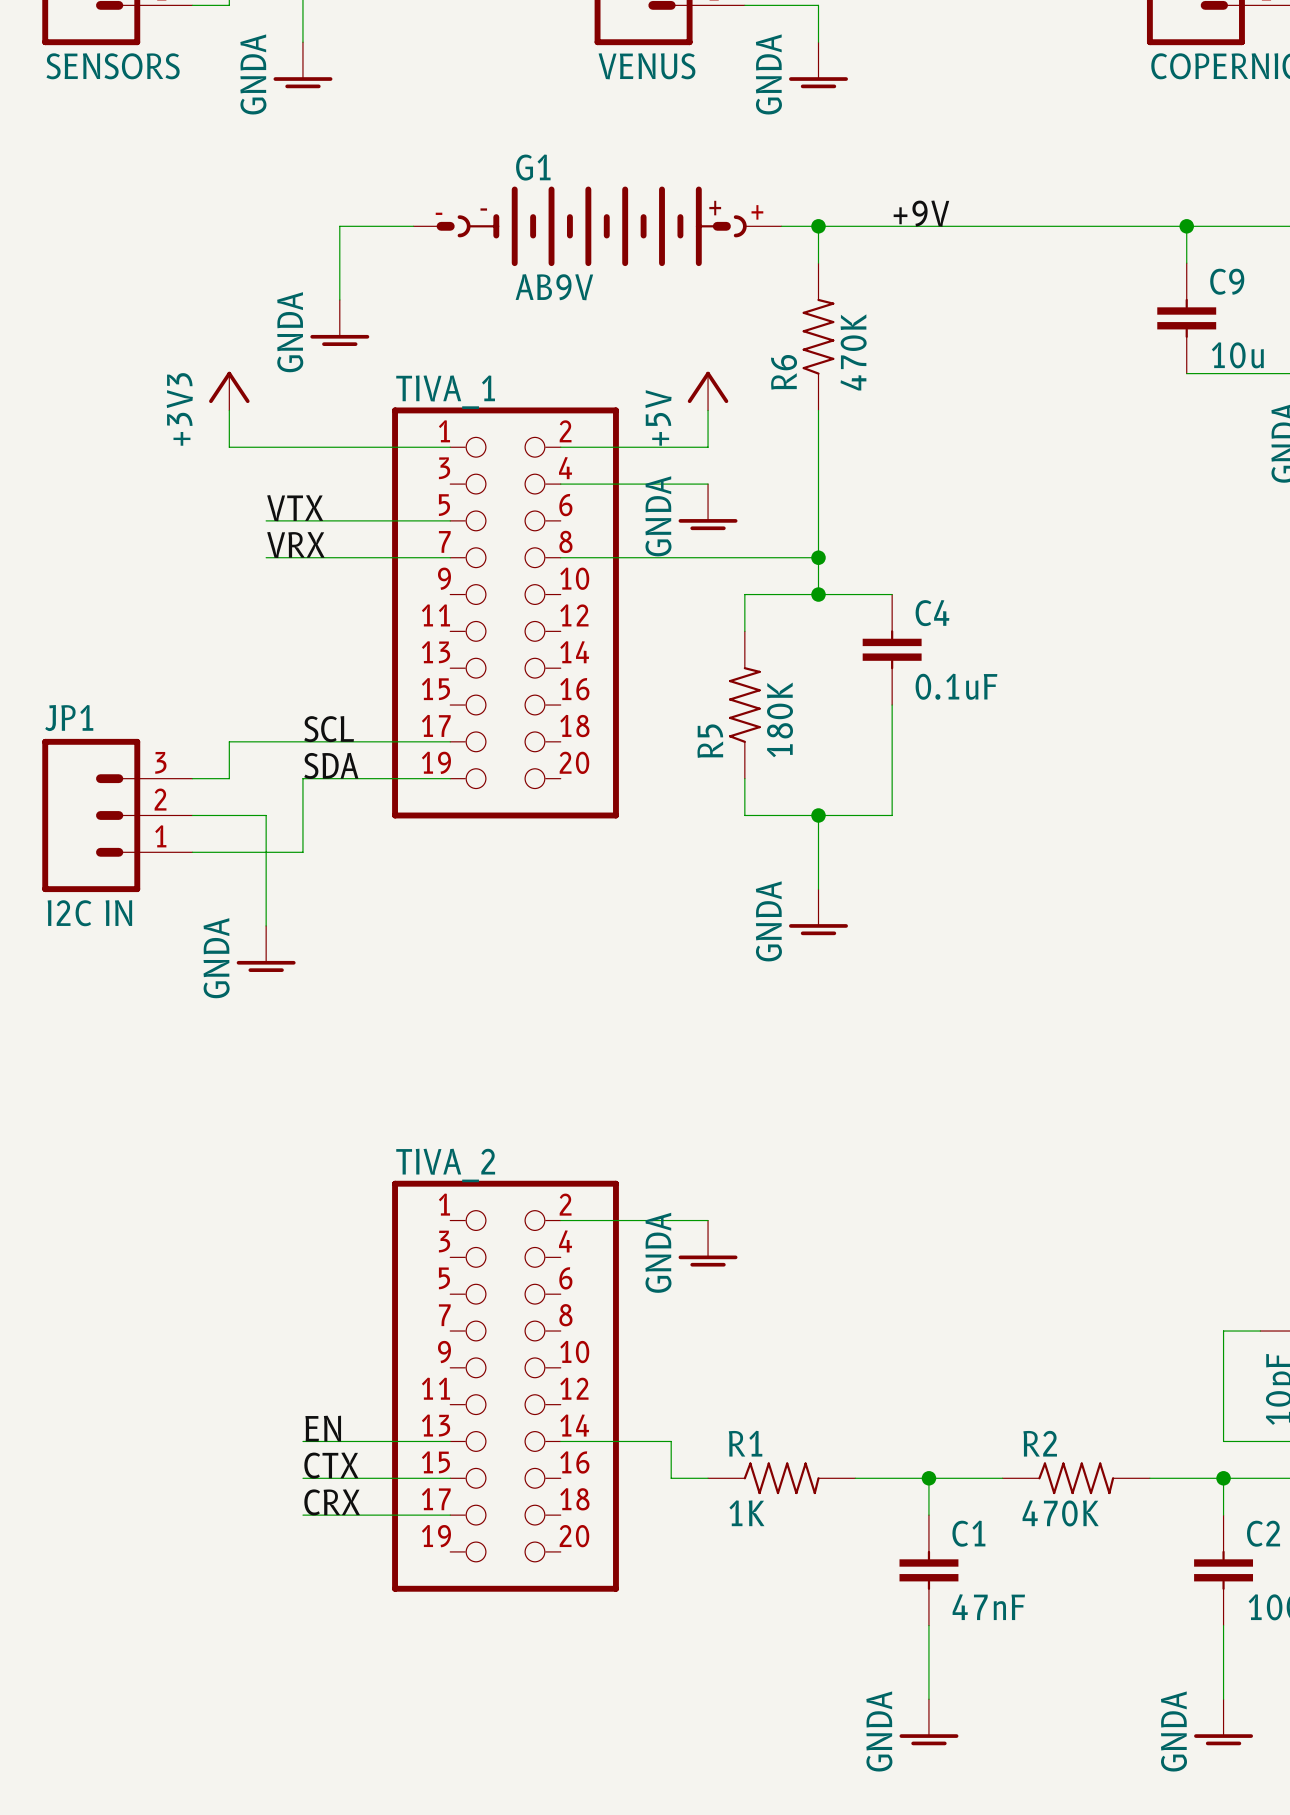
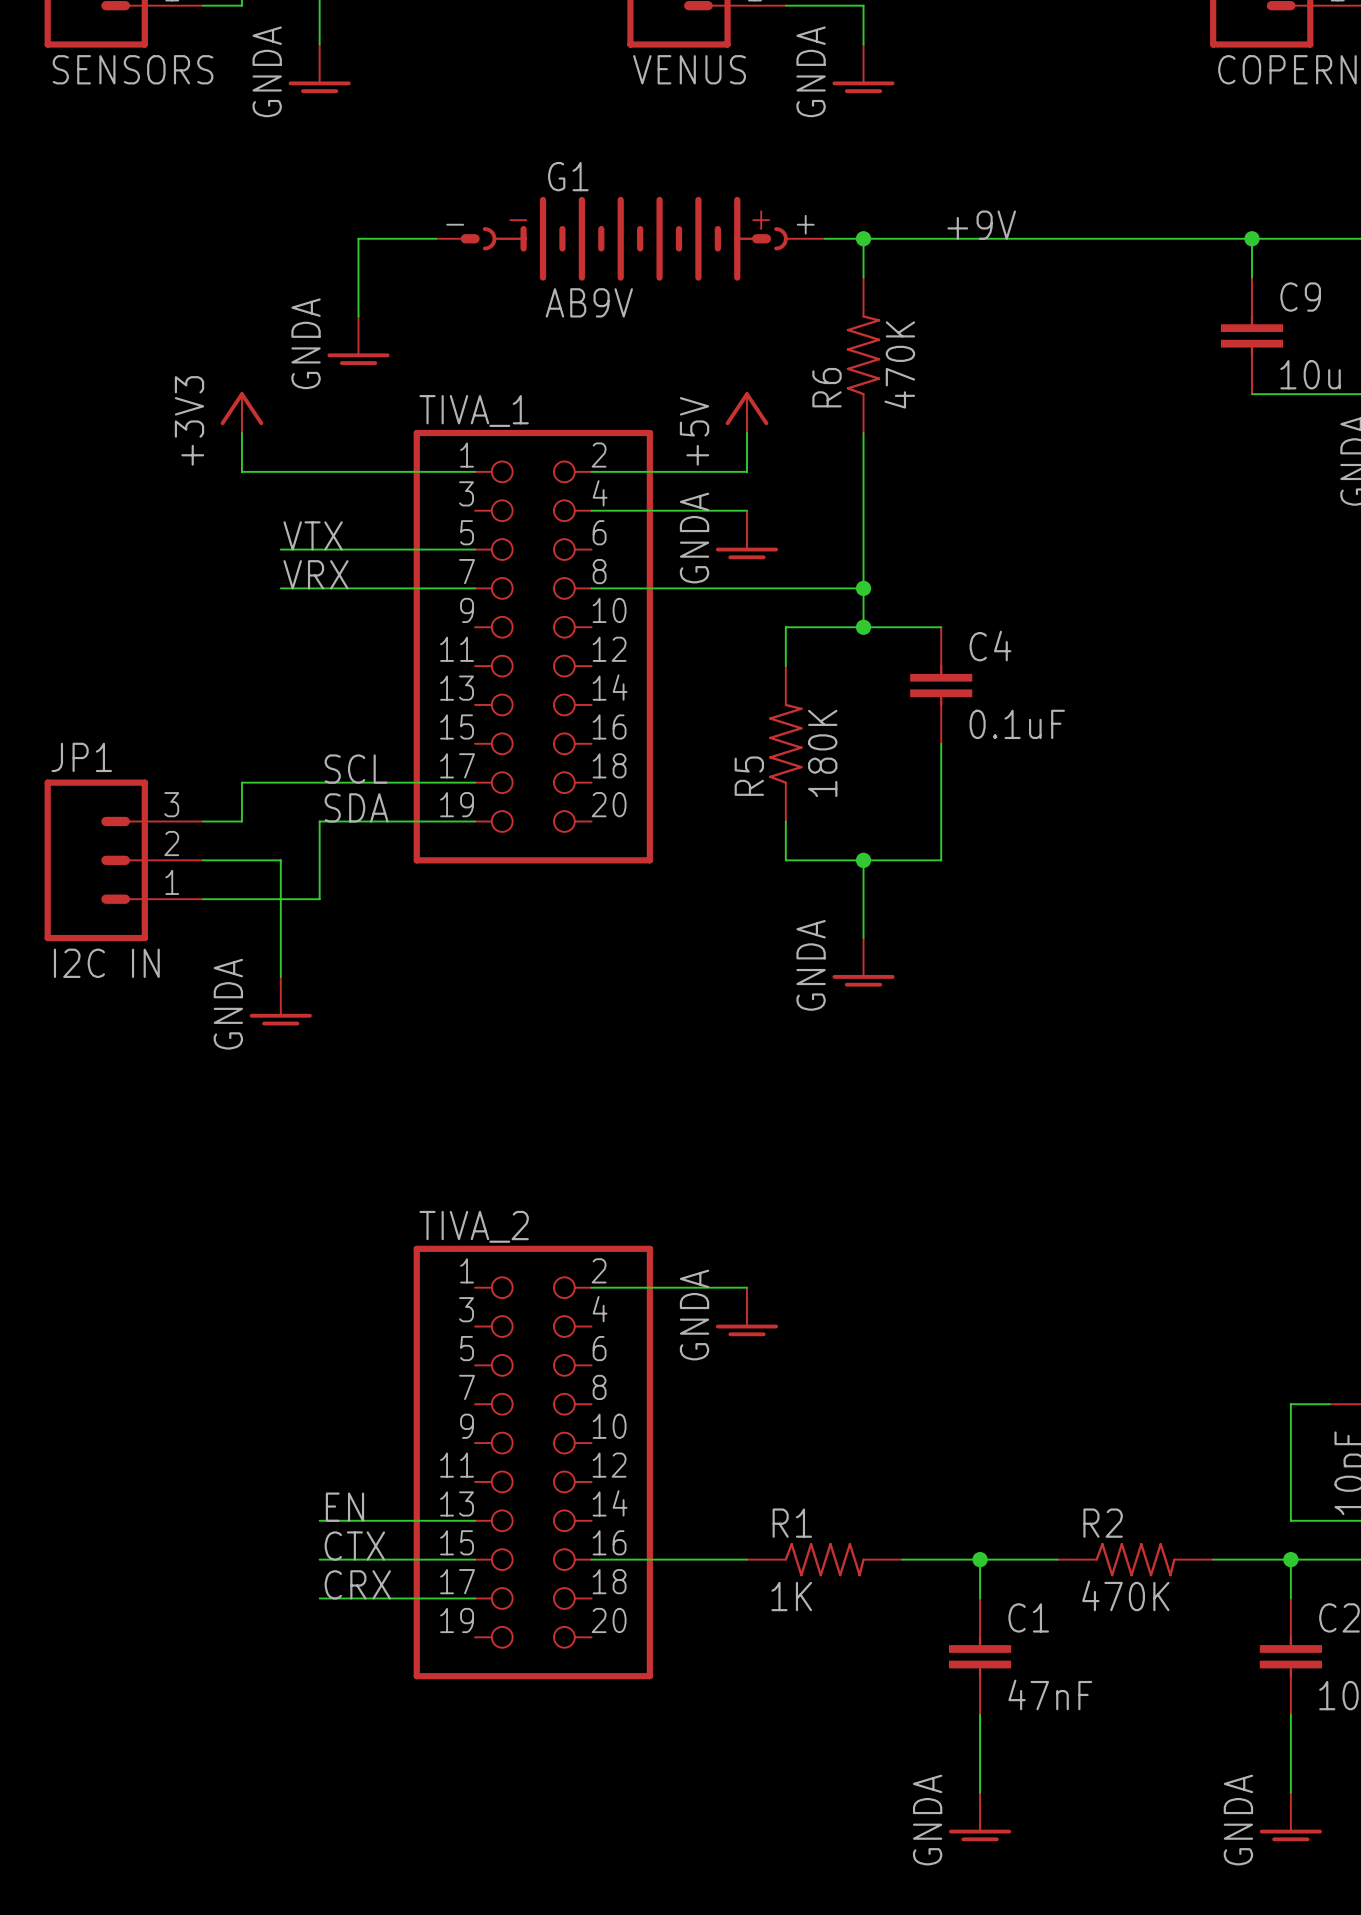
wire: (560, 1441) (671, 1441) (671, 1478) -> (591, 1559) (708, 1559)

